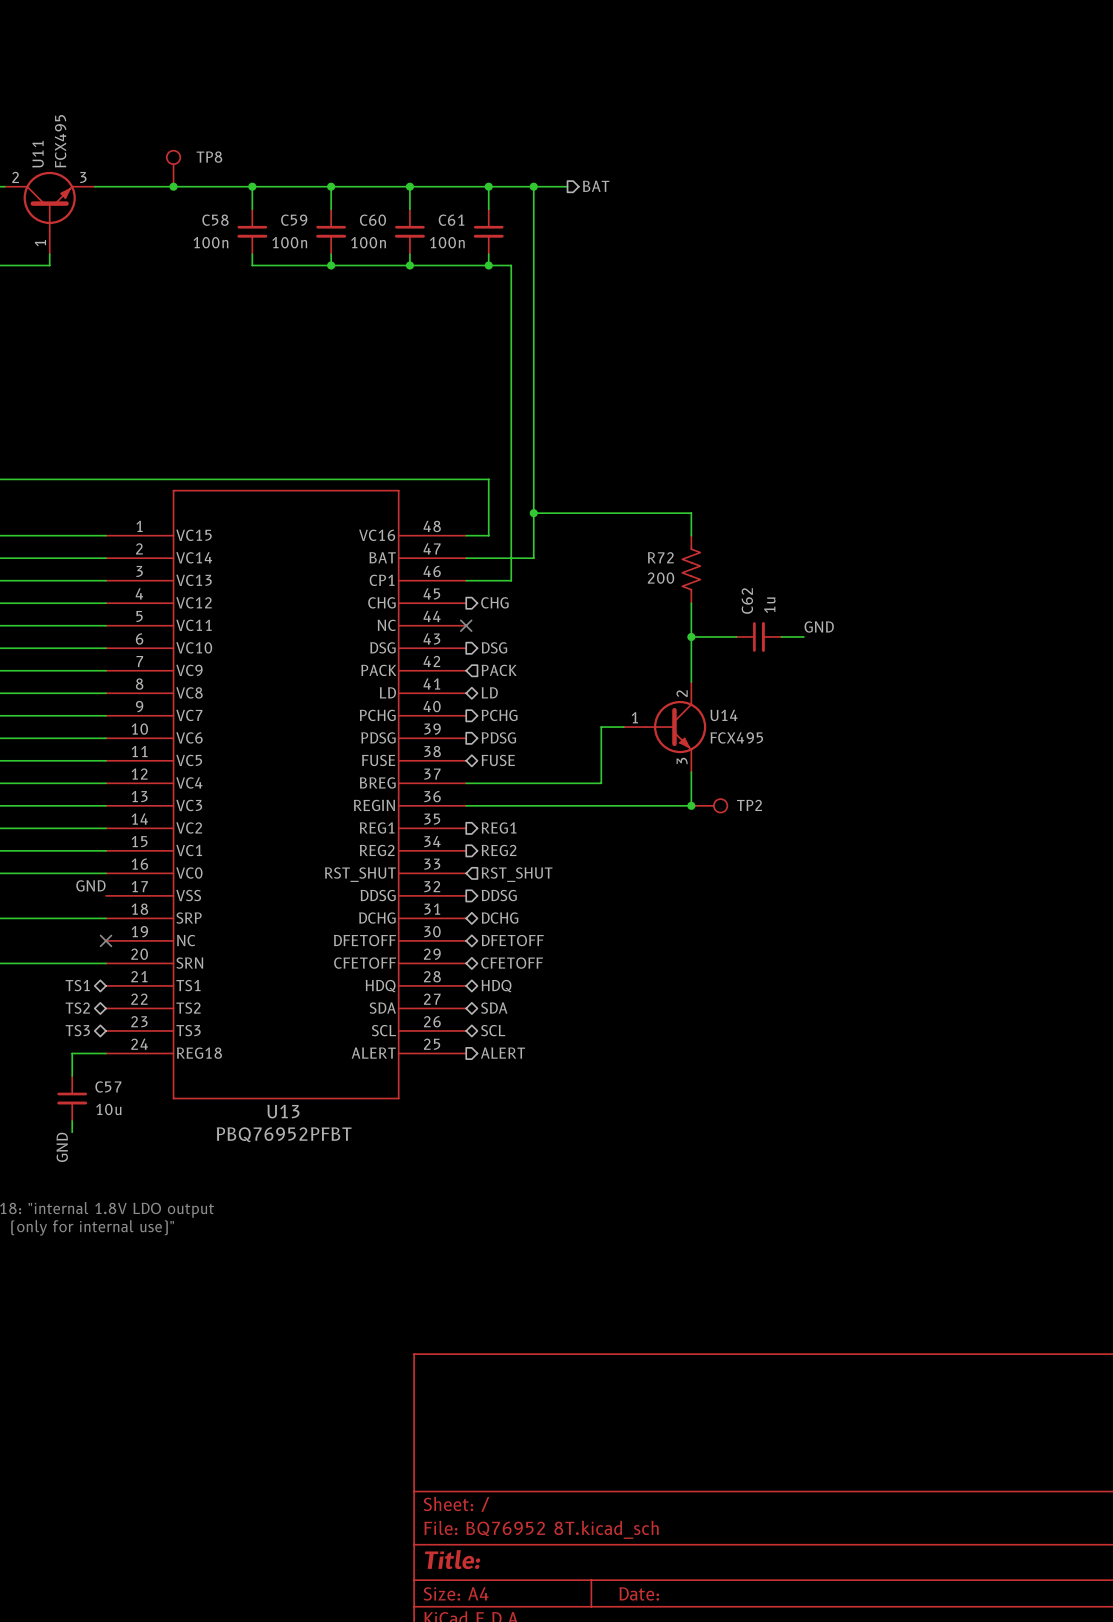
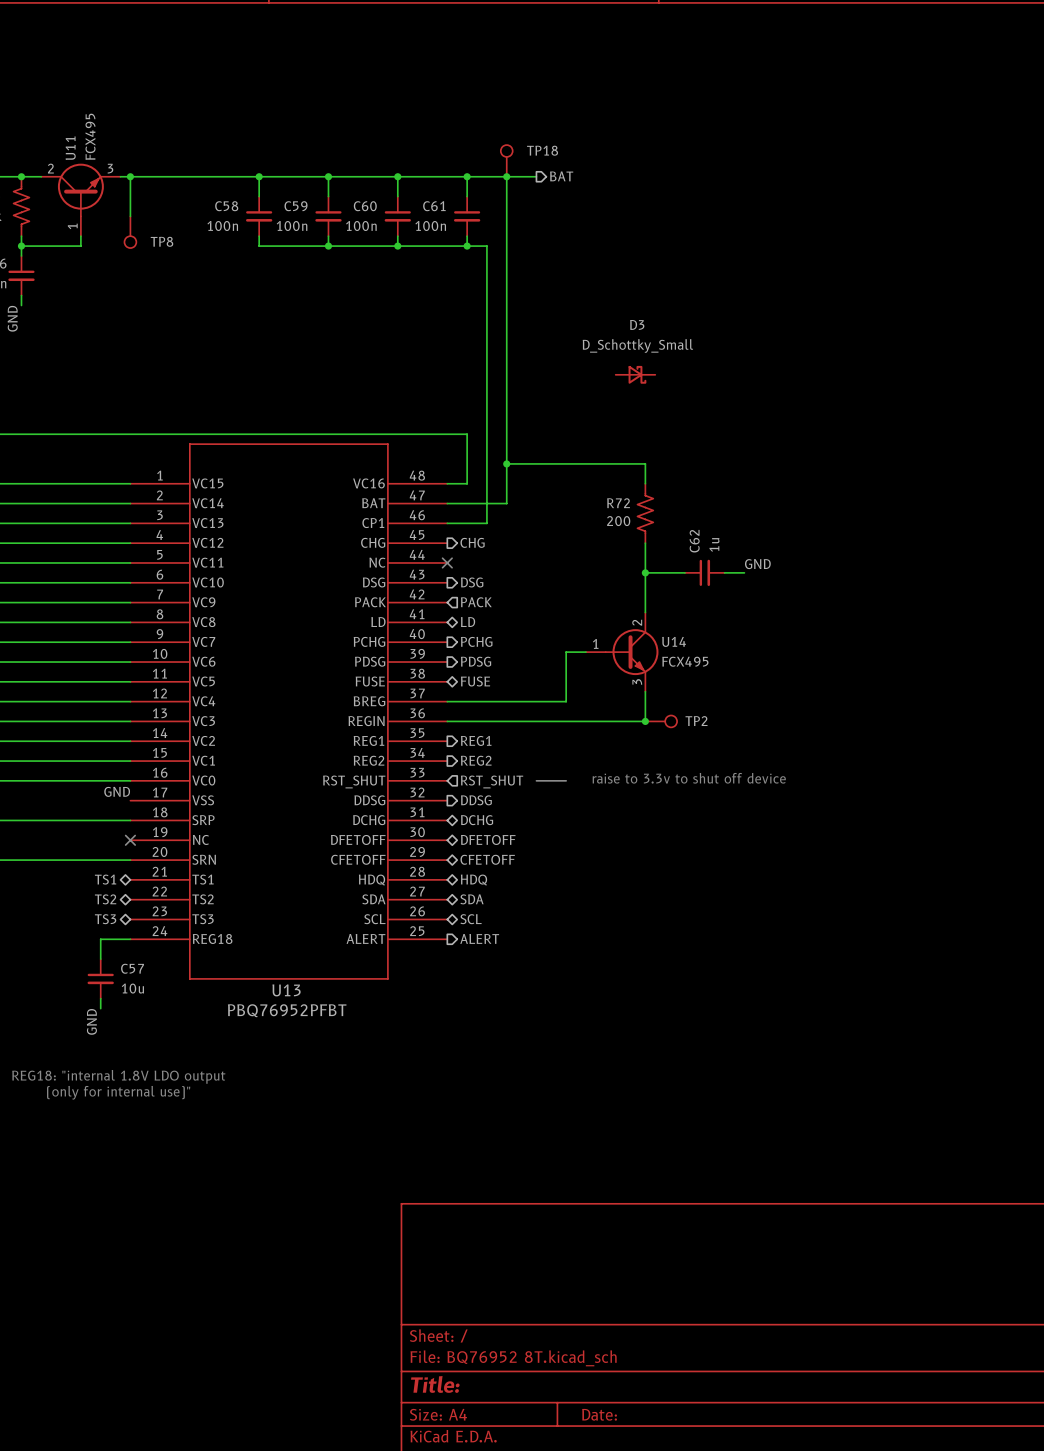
TP8 rotation: 0° (173, 157) -> 180° (130, 242)
TP8 name position: TP8 (209, 157) -> TP8 (161, 241)
TP8 position: (173, 168) -> (130, 232)
TP18: none -> (506, 160)
wire: none -> (130, 176) (130, 216)
junction: none -> (130, 176)
junction: (173, 186) -> none
D3: none -> D_Schottky_Small (635, 374)
text: none -> raise to 3.3v to shut off device (689, 778)
line: none -> (536, 780) (566, 780)

